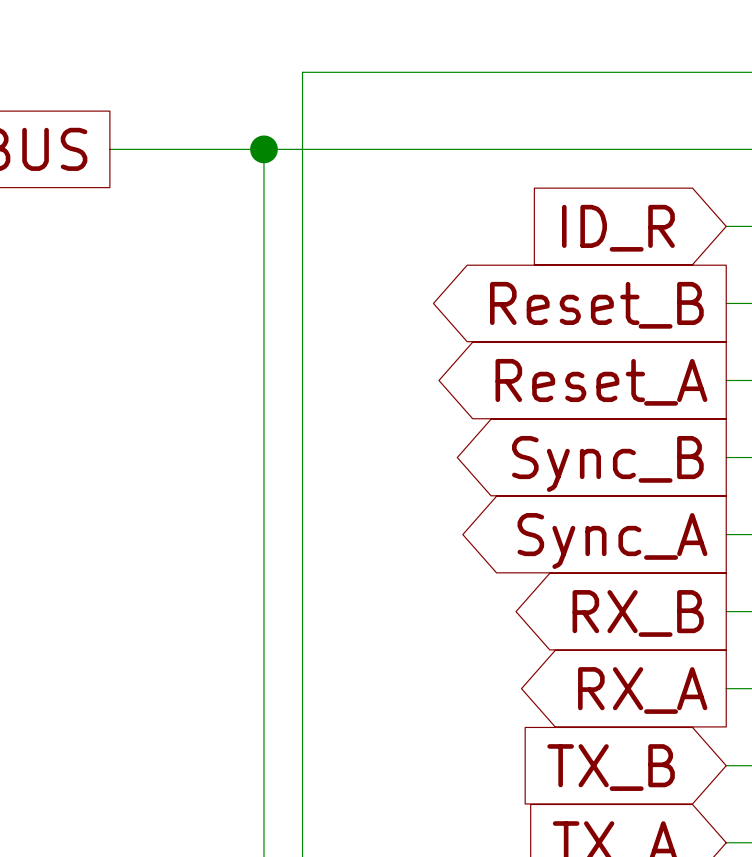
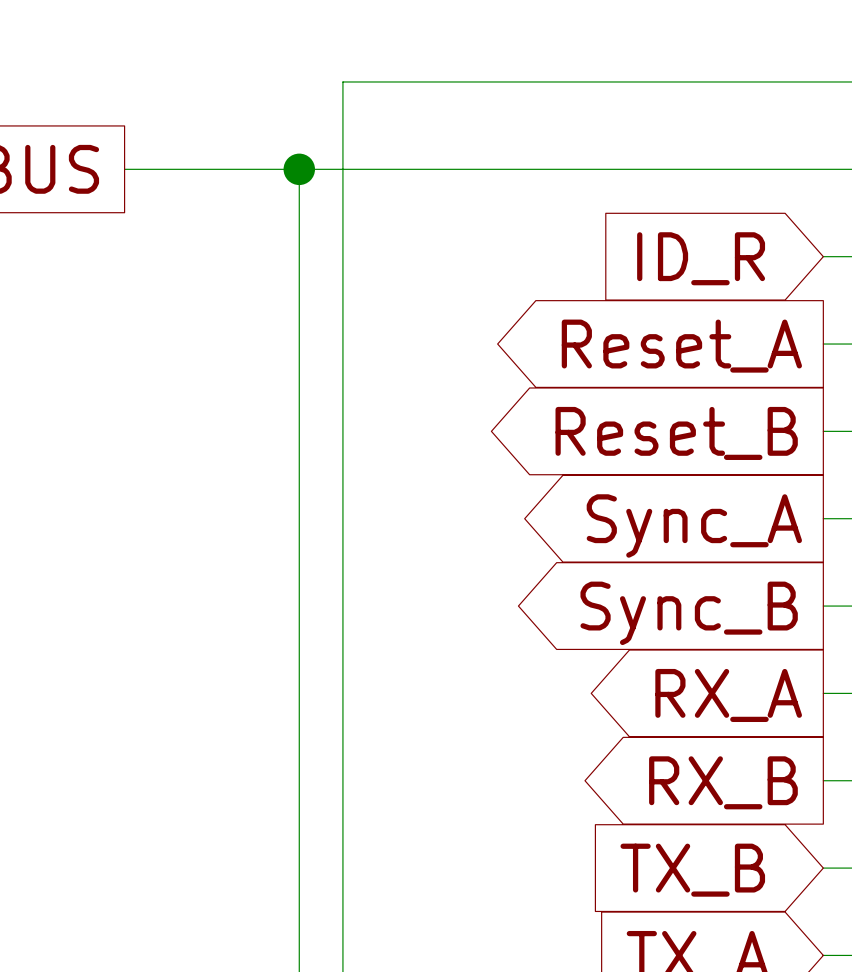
global label: Reset_B (596, 305) -> Reset_A (681, 346)
global label: Reset_A (601, 382) -> Reset_B (676, 433)
global label: Sync_B (607, 463) -> Sync_A (694, 525)
global label: Sync_A (612, 541) -> Sync_B (689, 613)
global label: RX_B (638, 613) -> RX_A (728, 695)
global label: RX_A (642, 690) -> RX_B (723, 782)

